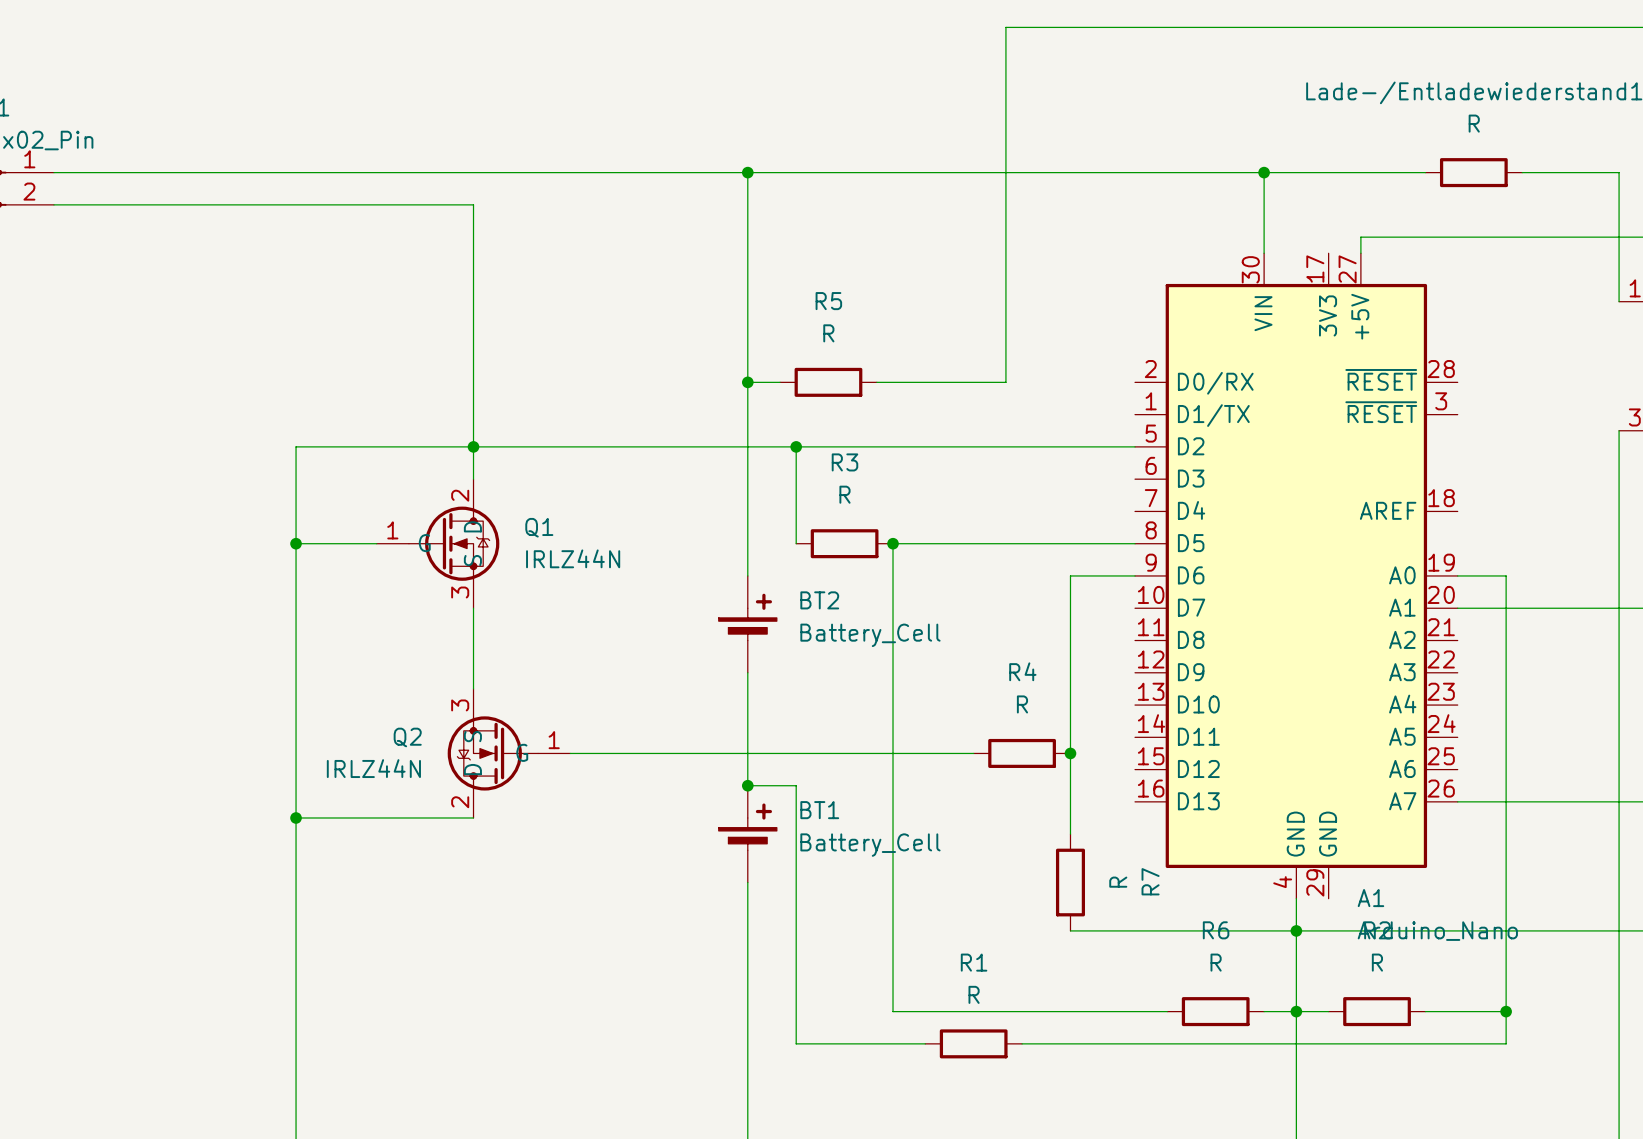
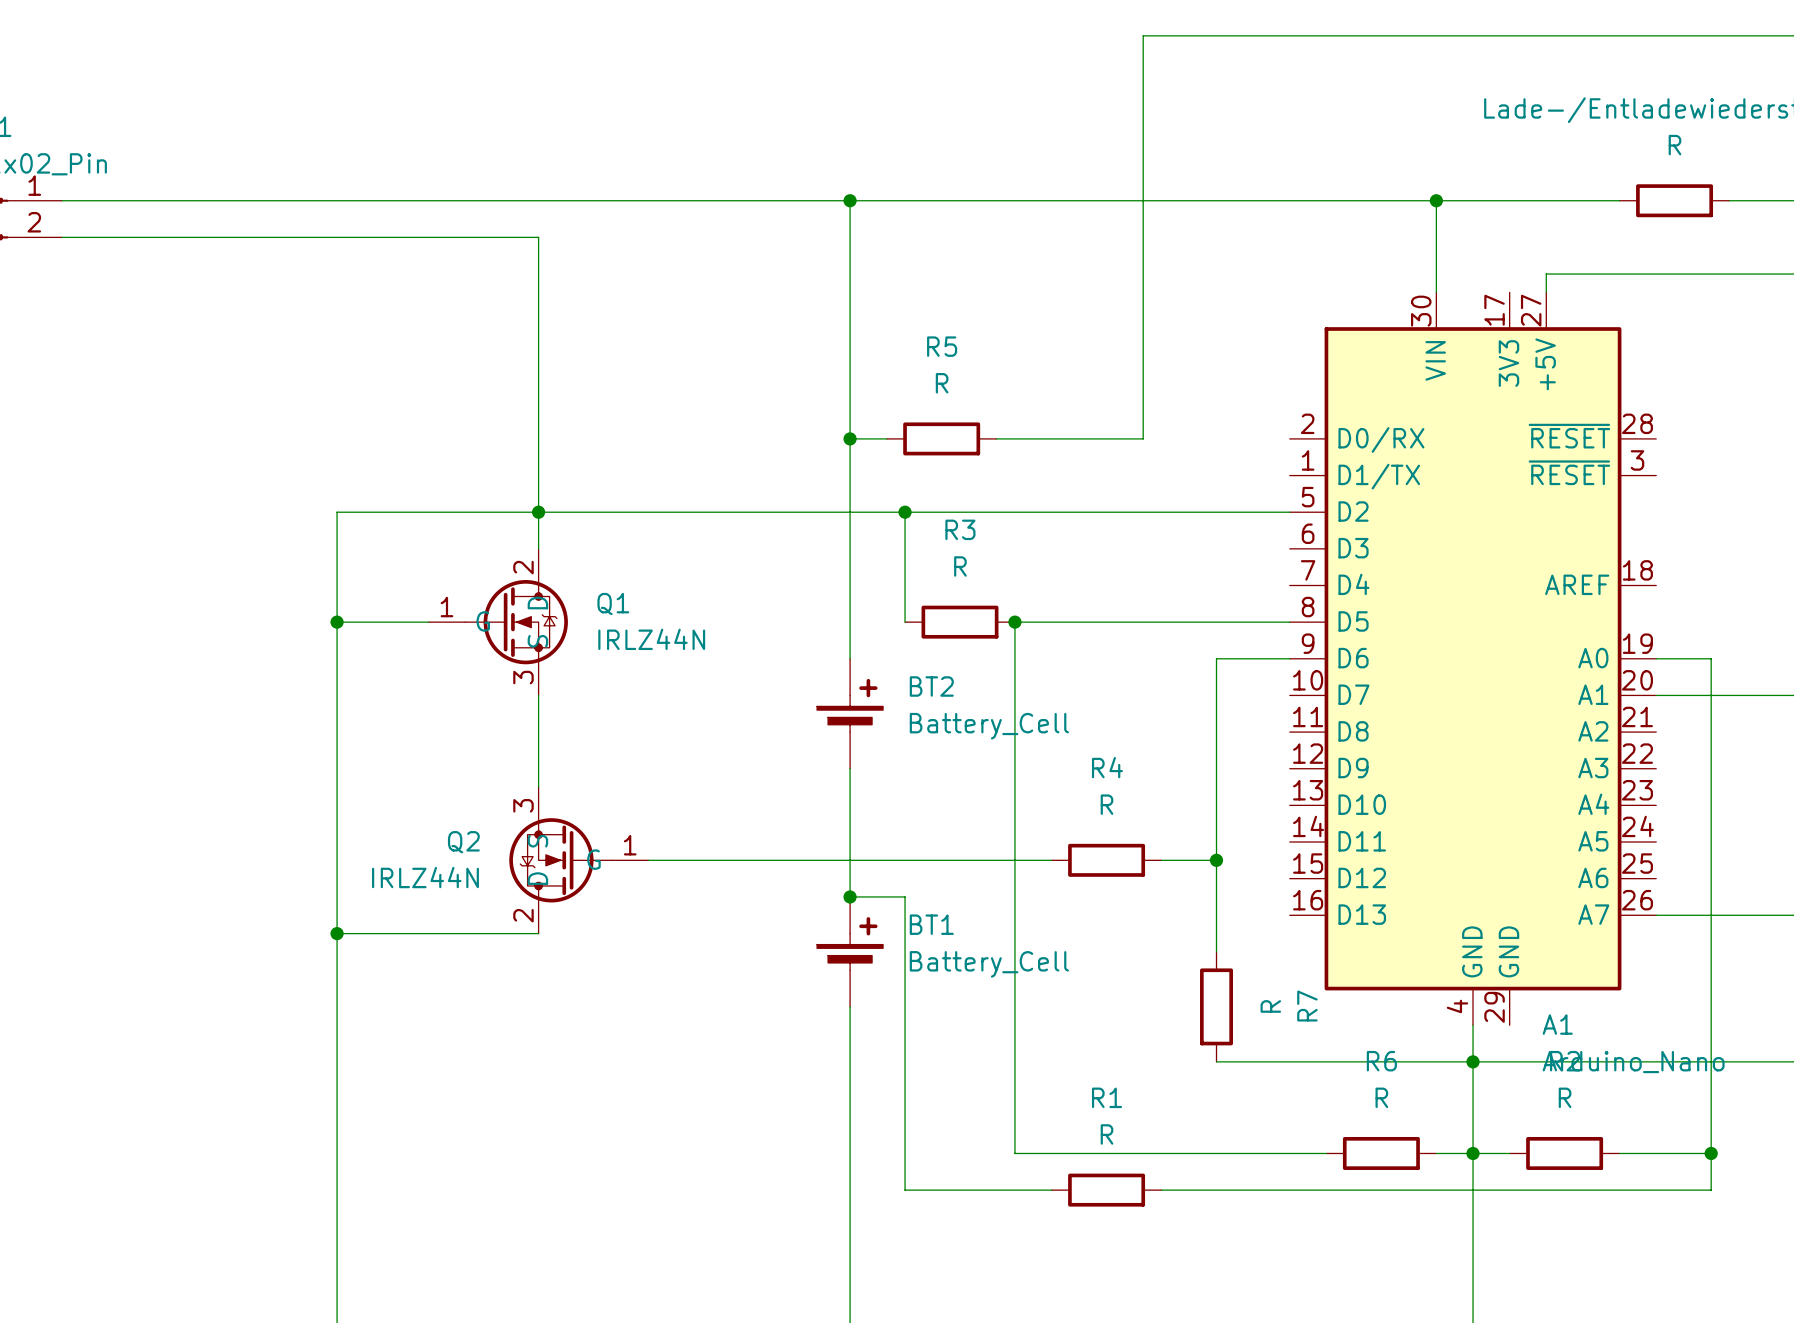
wire: (925, 753) (973, 753) -> (1161, 860) (1216, 860)
R4 position: (1022, 753) -> (1106, 860)

